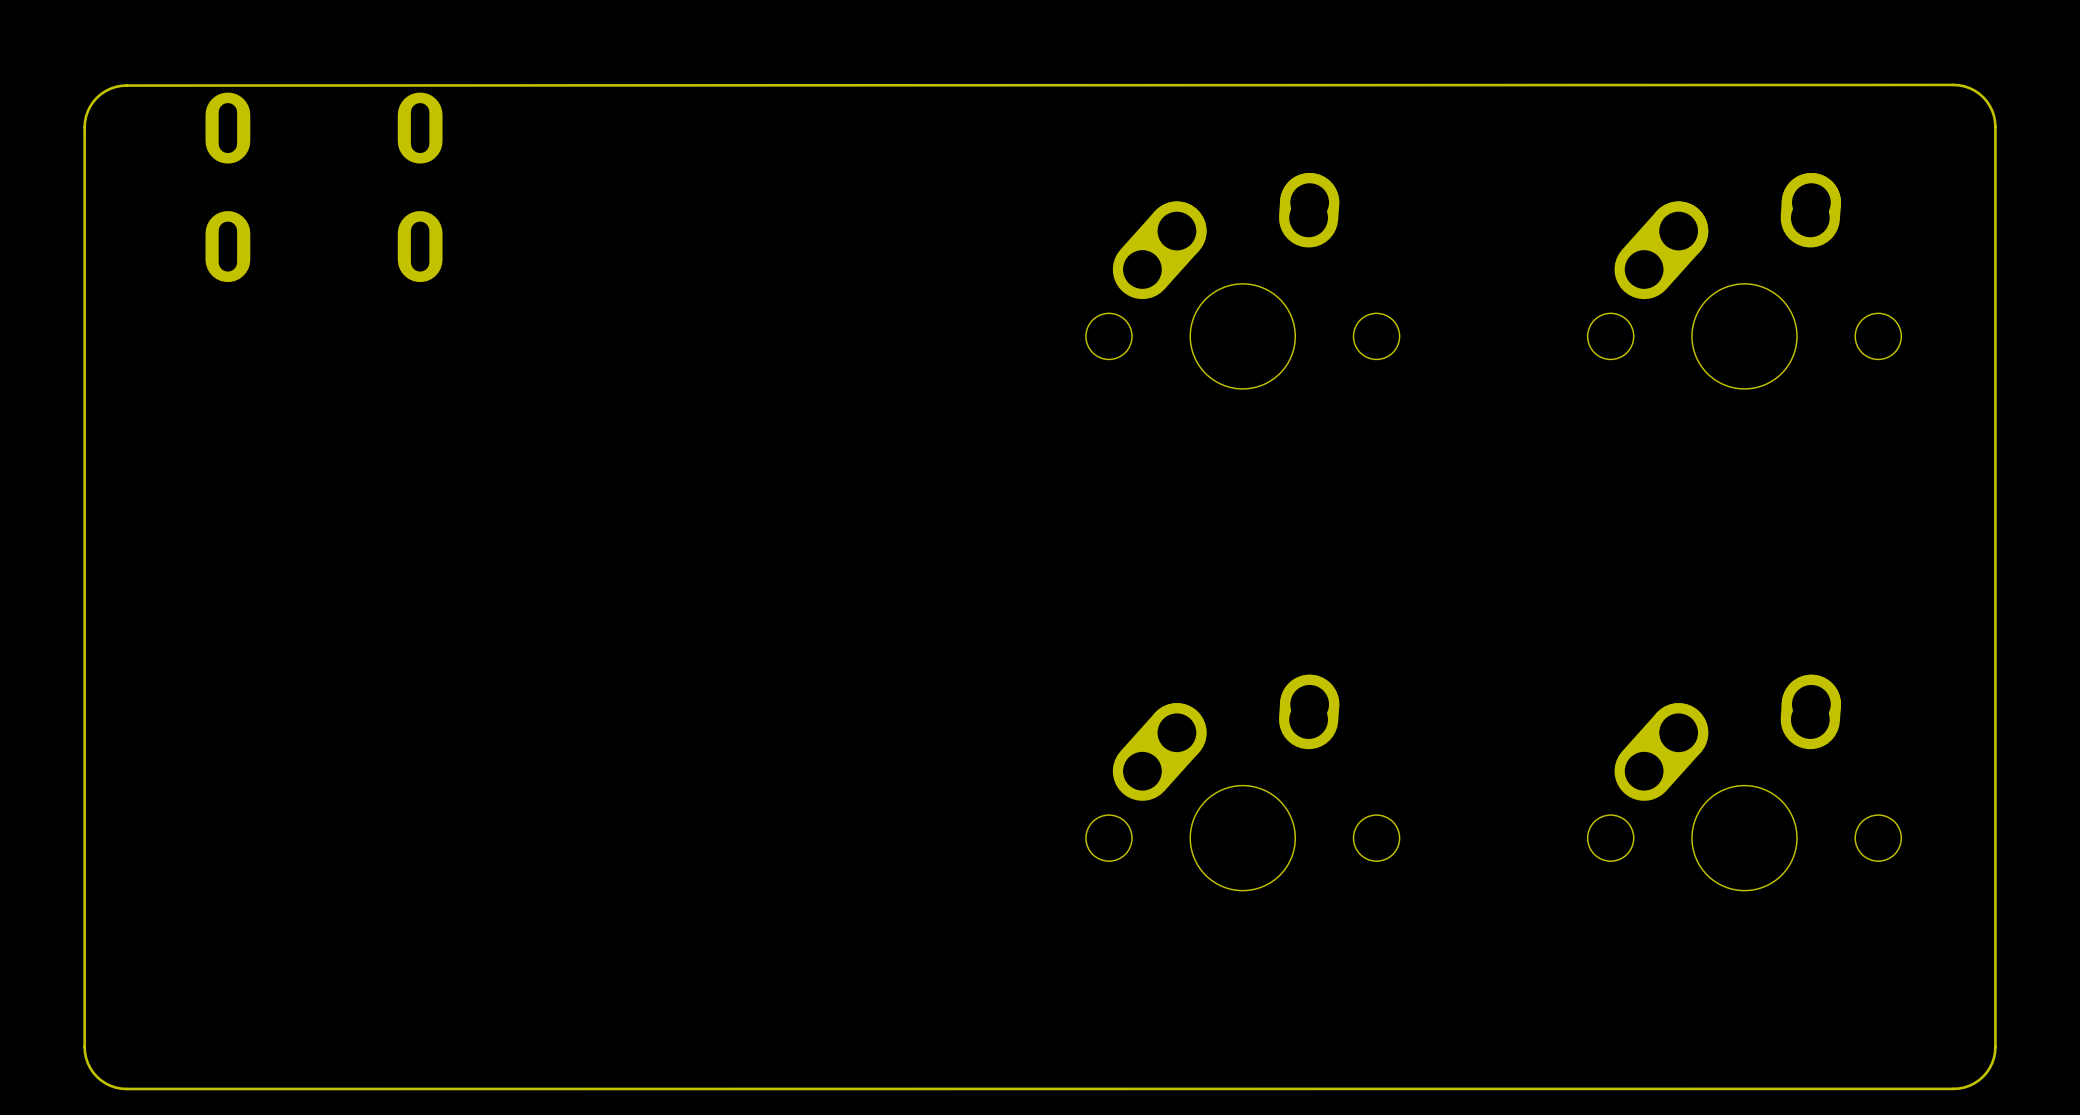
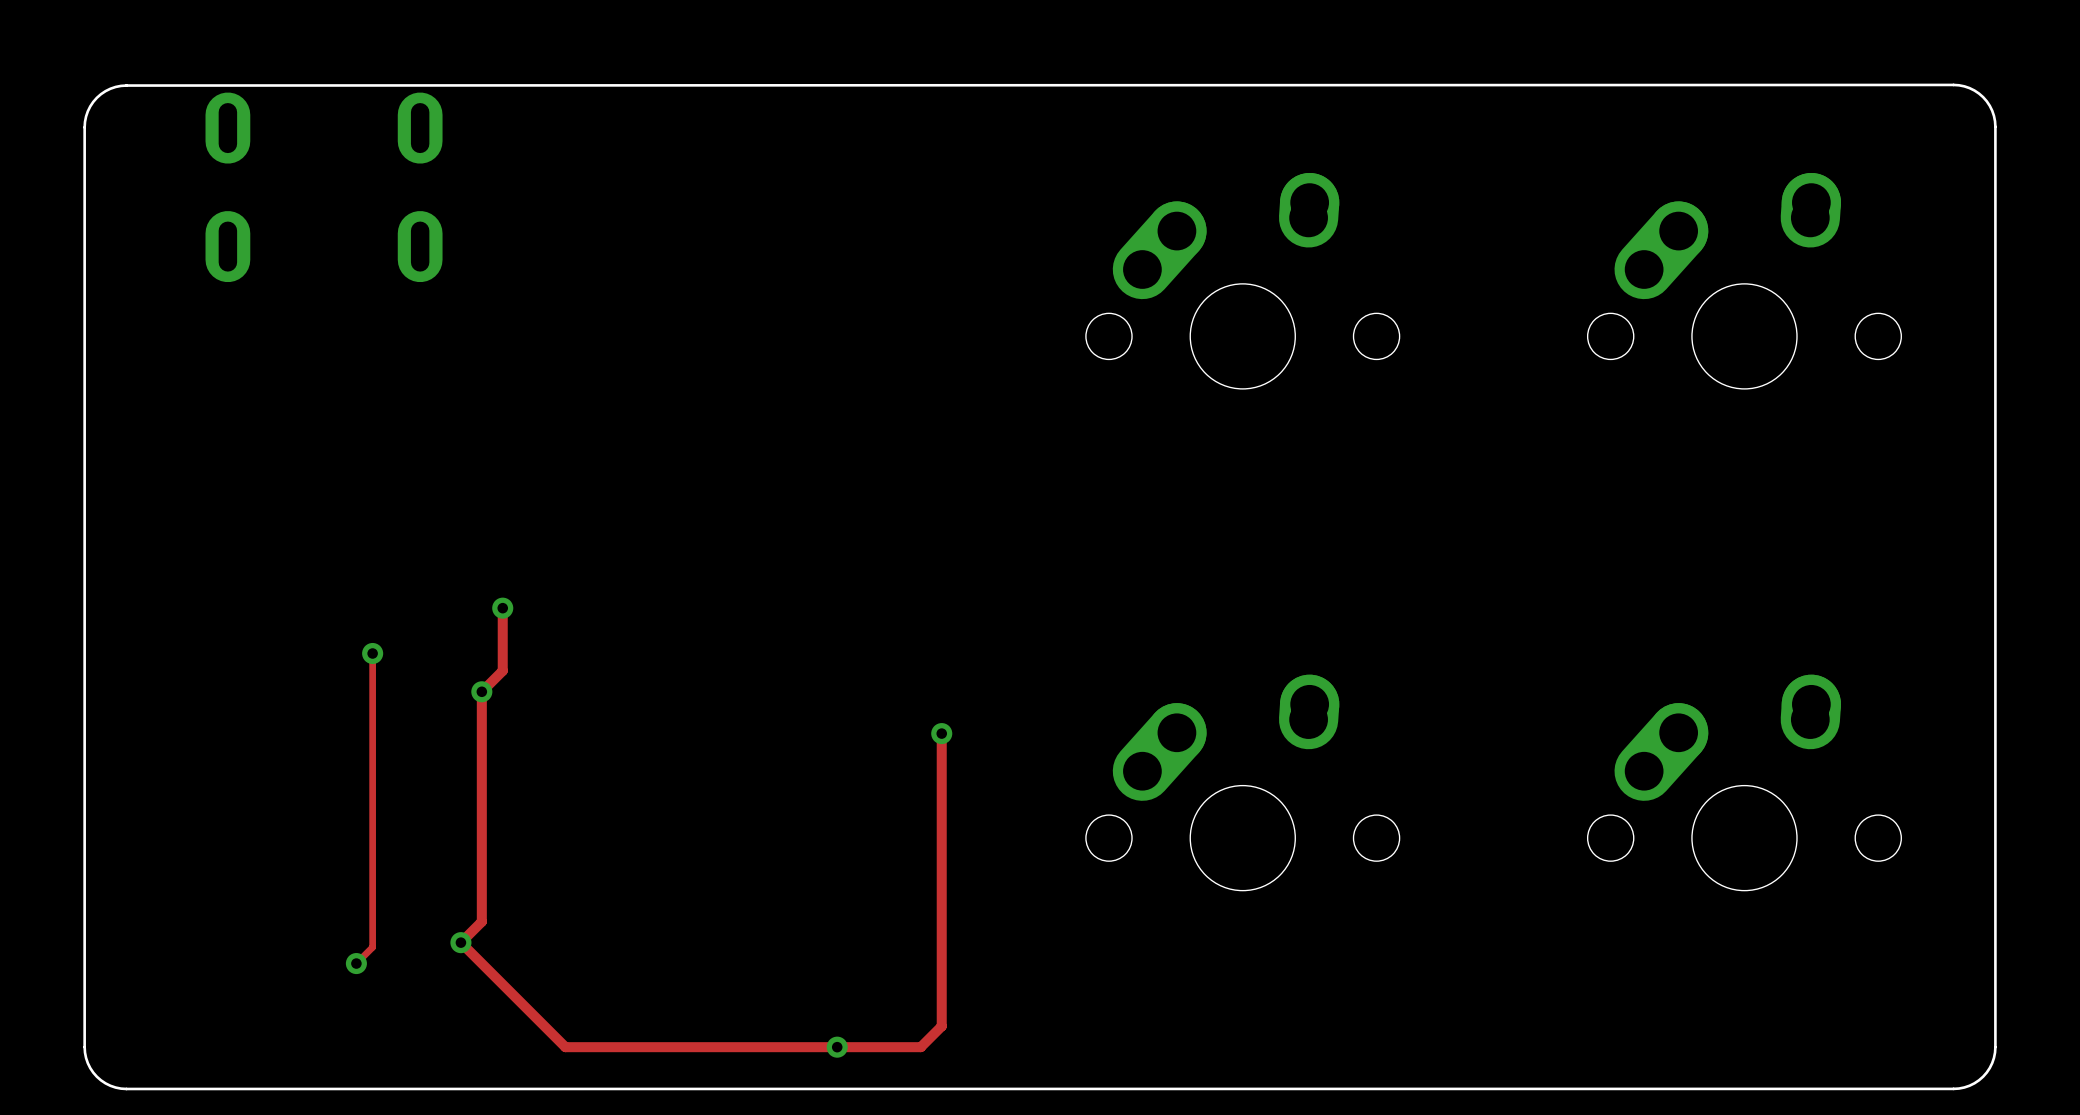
track: none -> (502, 608) (502, 670) (481, 691) (481, 921) (460, 942) (565, 1047) (920, 1047) (941, 1026) (941, 733)
via: none -> (502, 608)
track: none -> (372, 653) (372, 947) (356, 963)
via: none -> (372, 653)
via: none -> (481, 691)
via: none -> (941, 733)
via: none -> (460, 942)
via: none -> (356, 963)
via: none -> (837, 1047)

